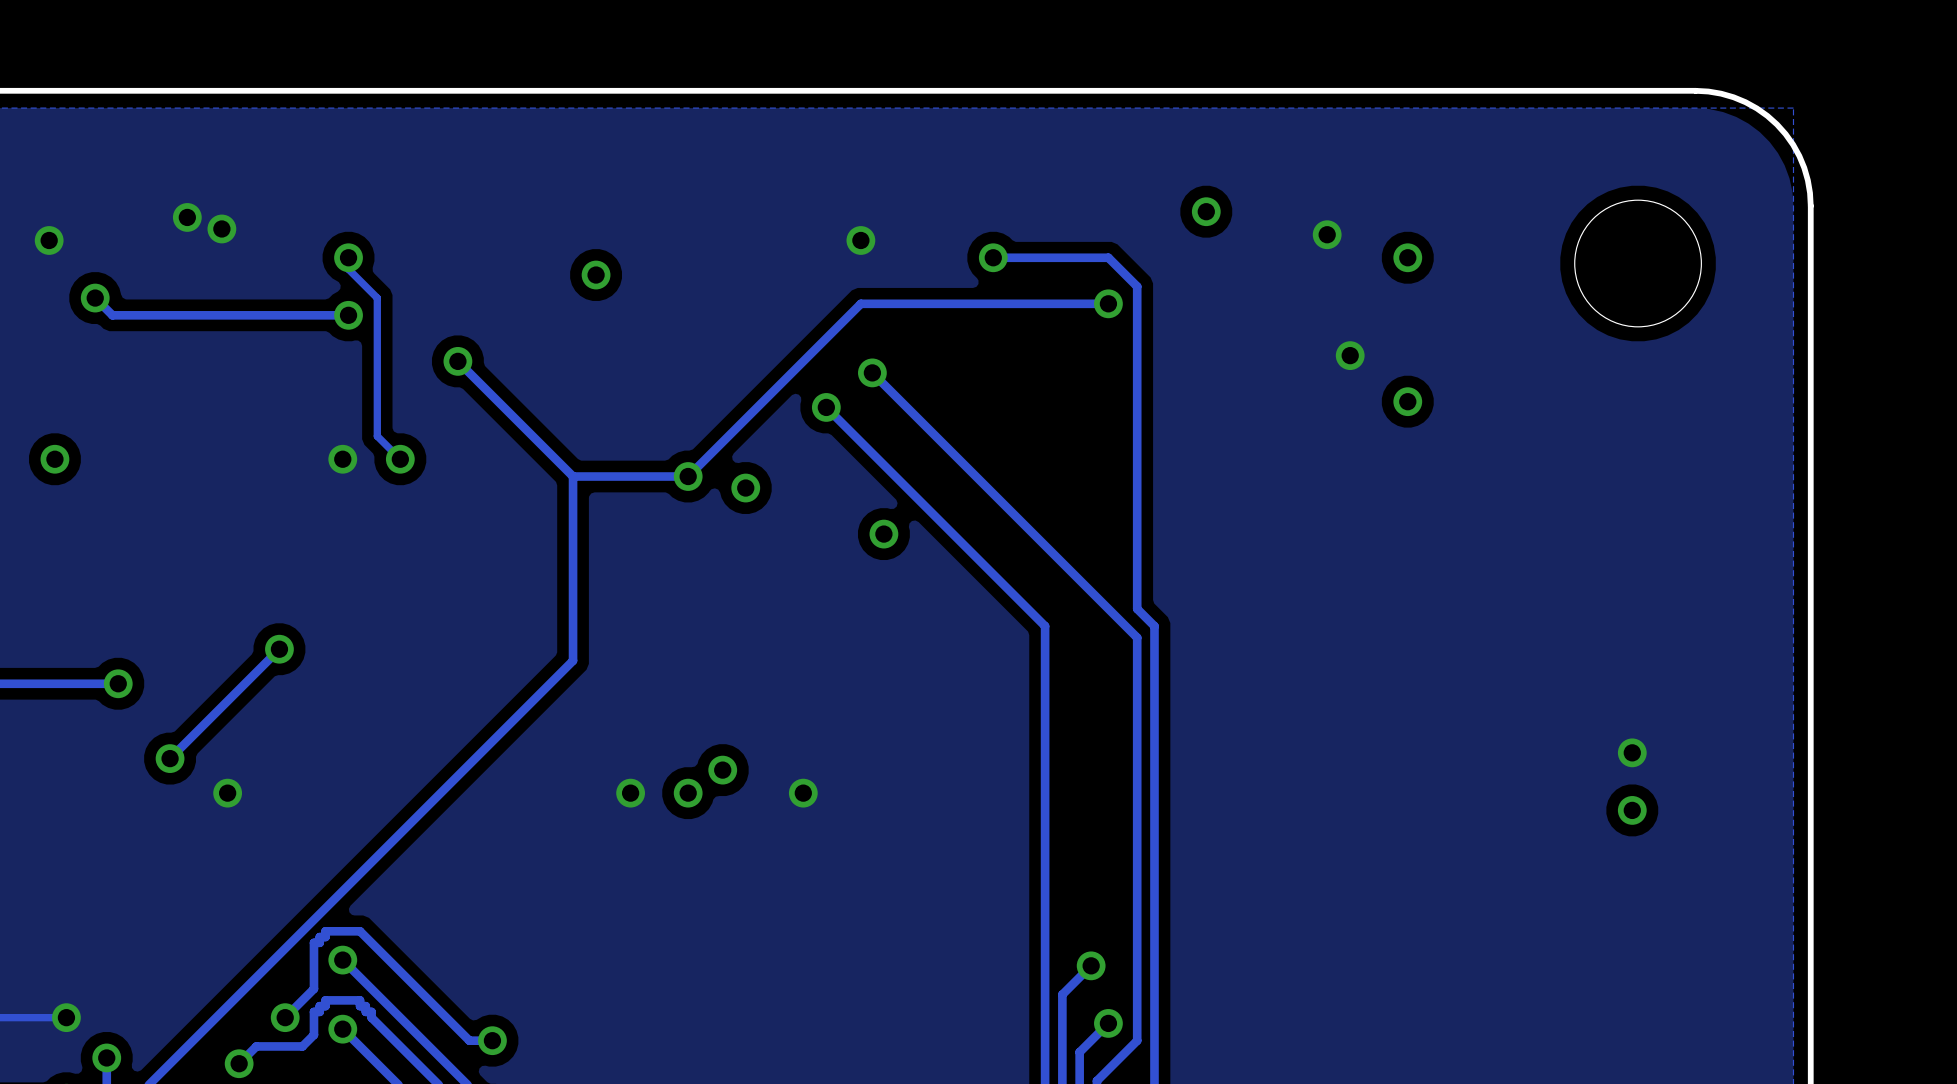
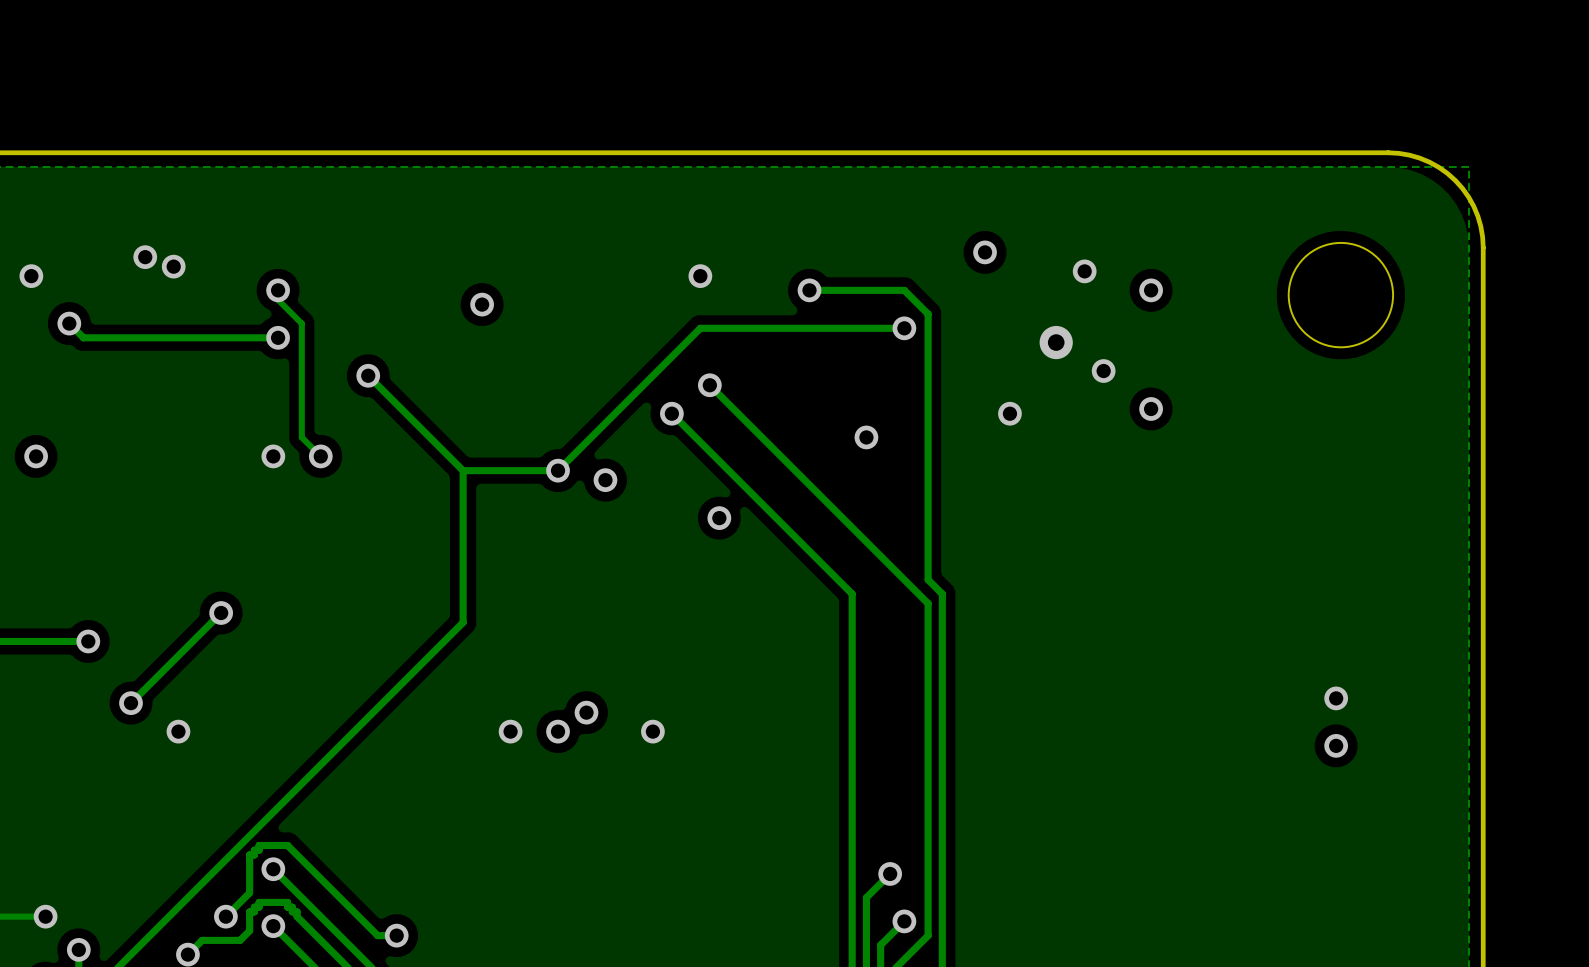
via: none -> (1056, 342)
via: none -> (1009, 413)
via: none -> (866, 437)

